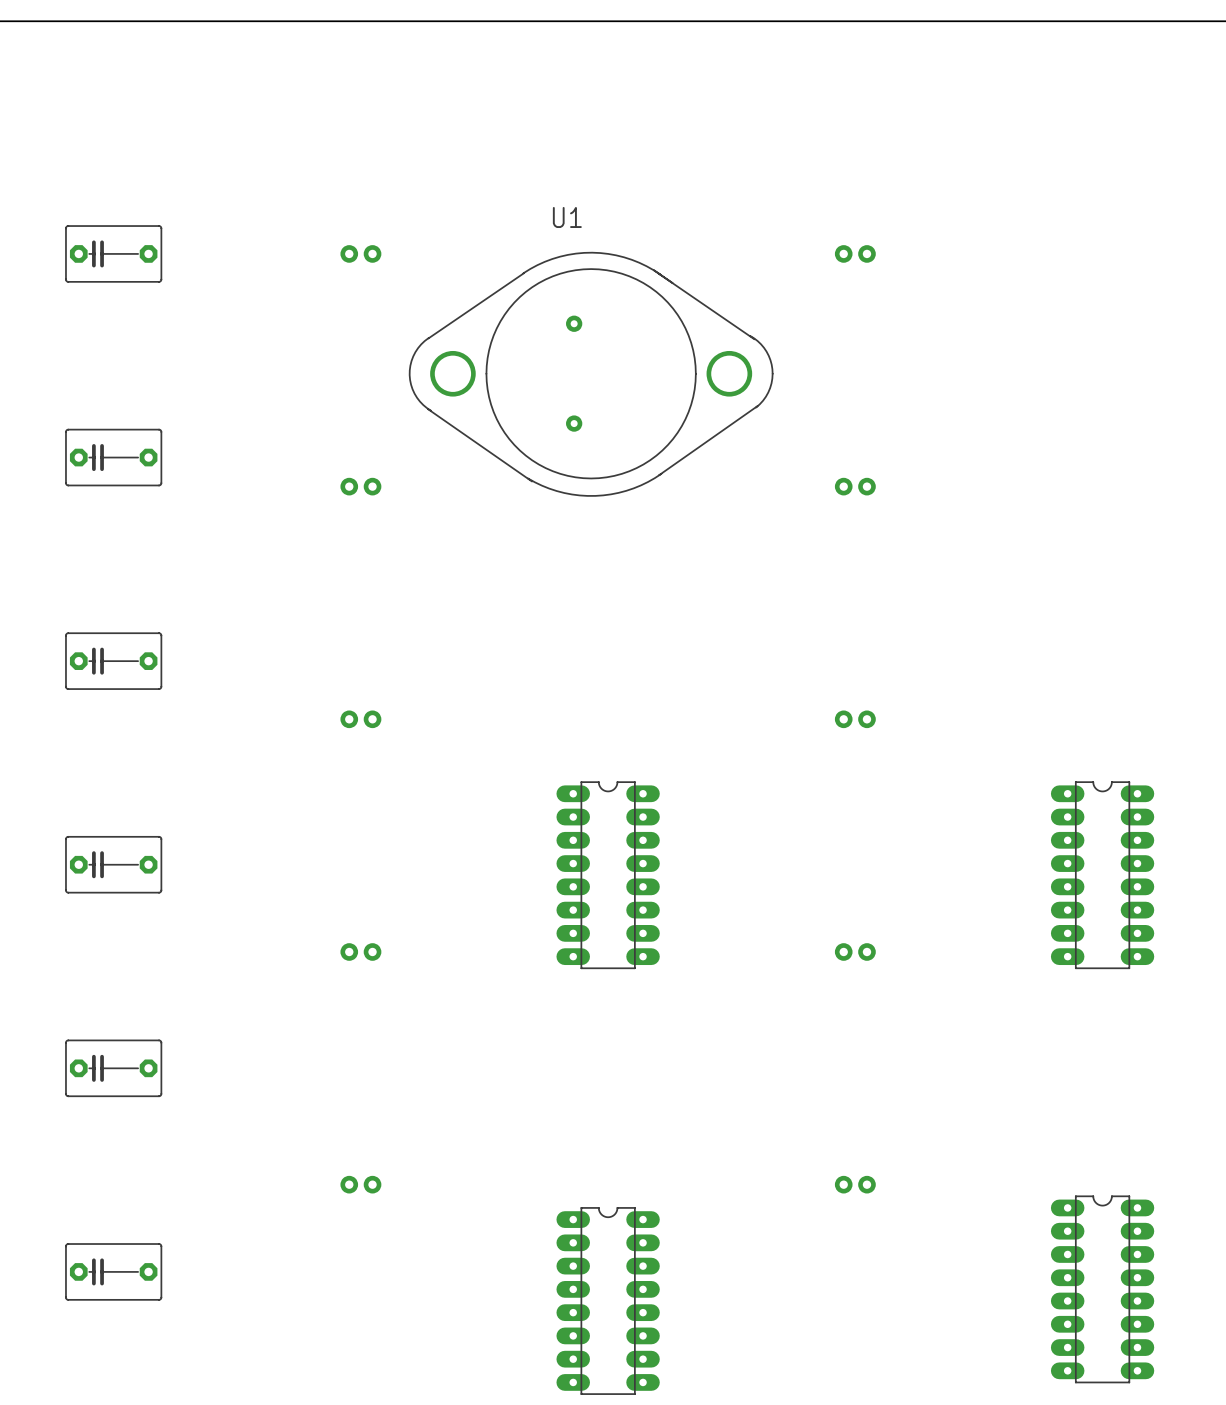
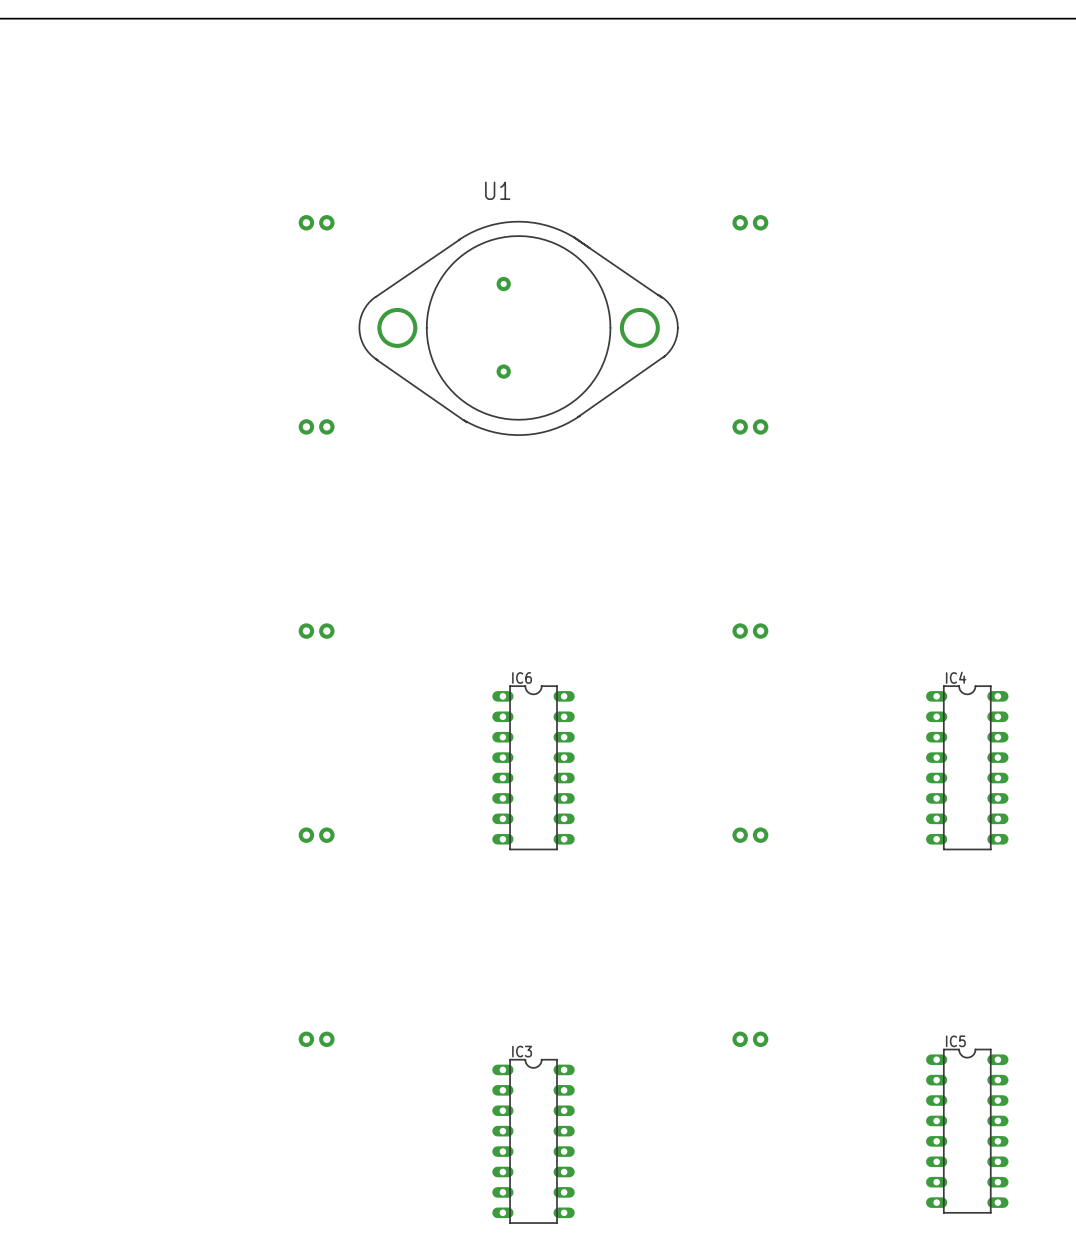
part: (113, 253) -> none
part: (113, 457) -> none
part: (113, 661) -> none
part: (113, 864) -> none
part: (608, 875) -> none
IC6: none -> (533, 767)
part: (1102, 875) -> none
IC4: none -> (967, 767)
part: (113, 1068) -> none
part: (113, 1271) -> none
part: (1102, 1289) -> none
IC5: none -> (967, 1131)
part: (608, 1301) -> none
IC3: none -> (533, 1141)

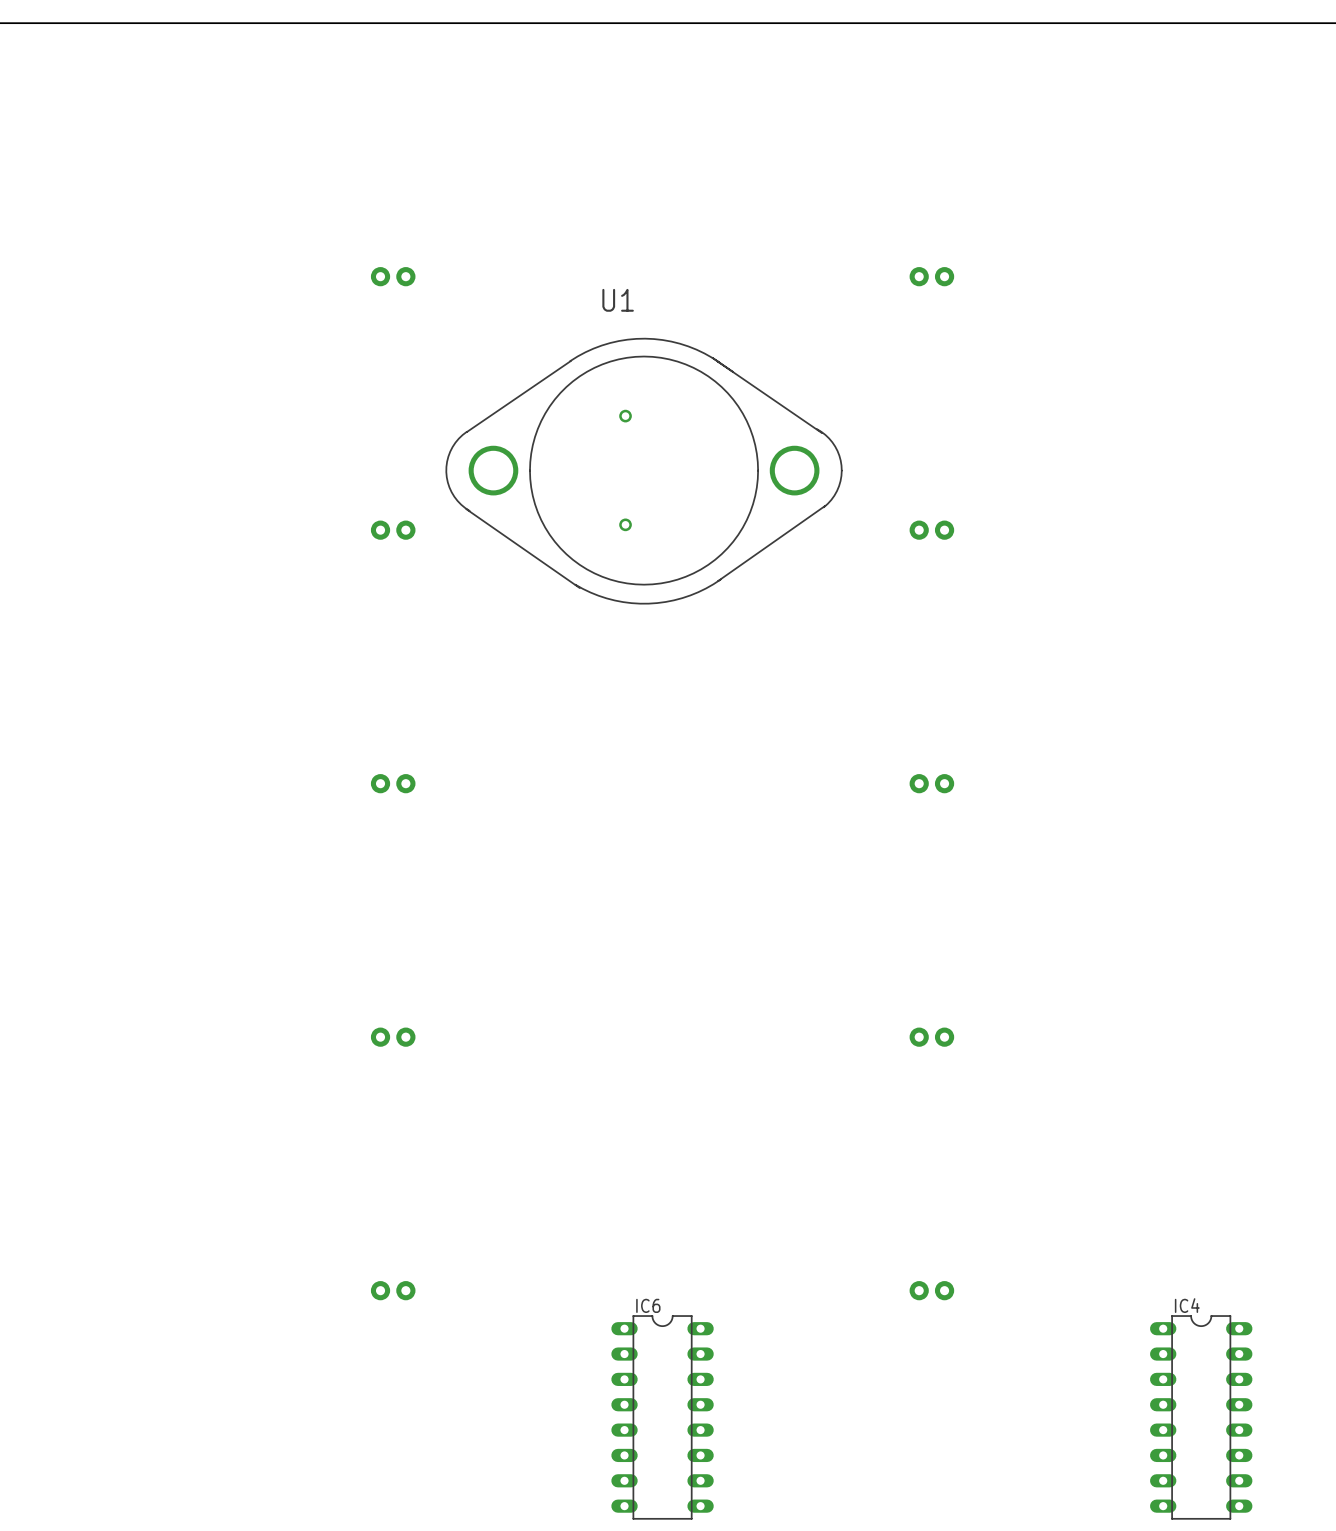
U1 footprint: [359, 221, 678, 436] -> [446, 338, 842, 604]
IC6: (533, 767) -> none
IC4 position: (967, 767) -> (1201, 1417)
IC3 name: IC3 (522, 1051) -> IC6 (648, 1305)
IC5: (967, 1131) -> none

